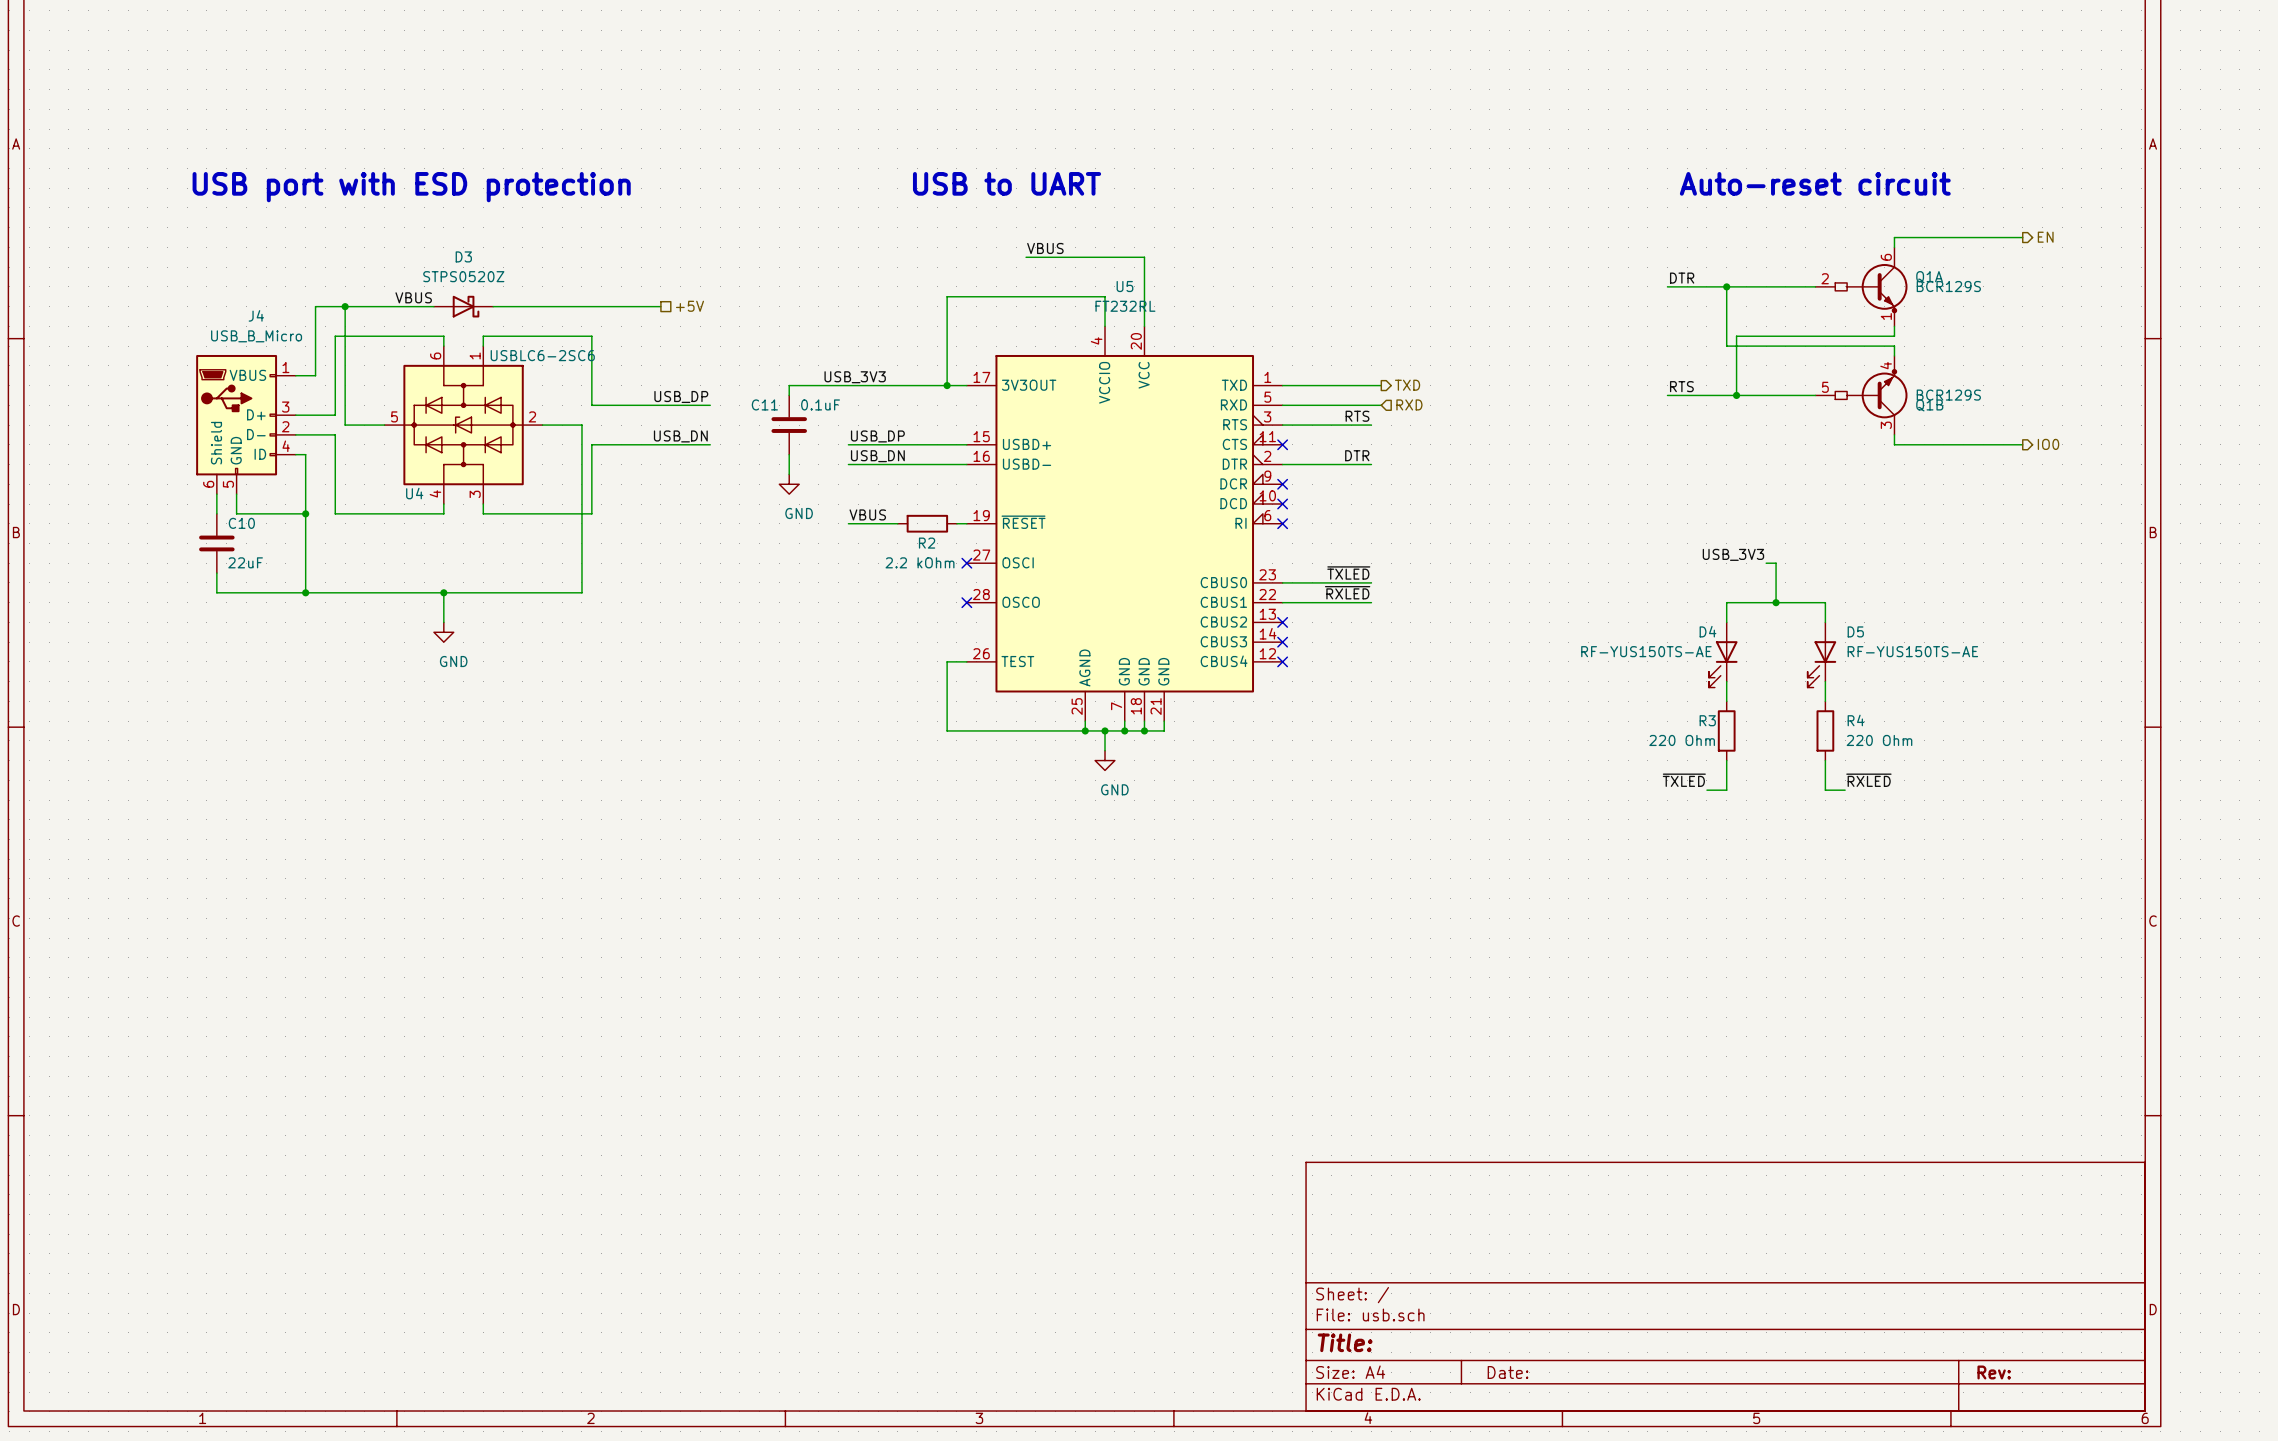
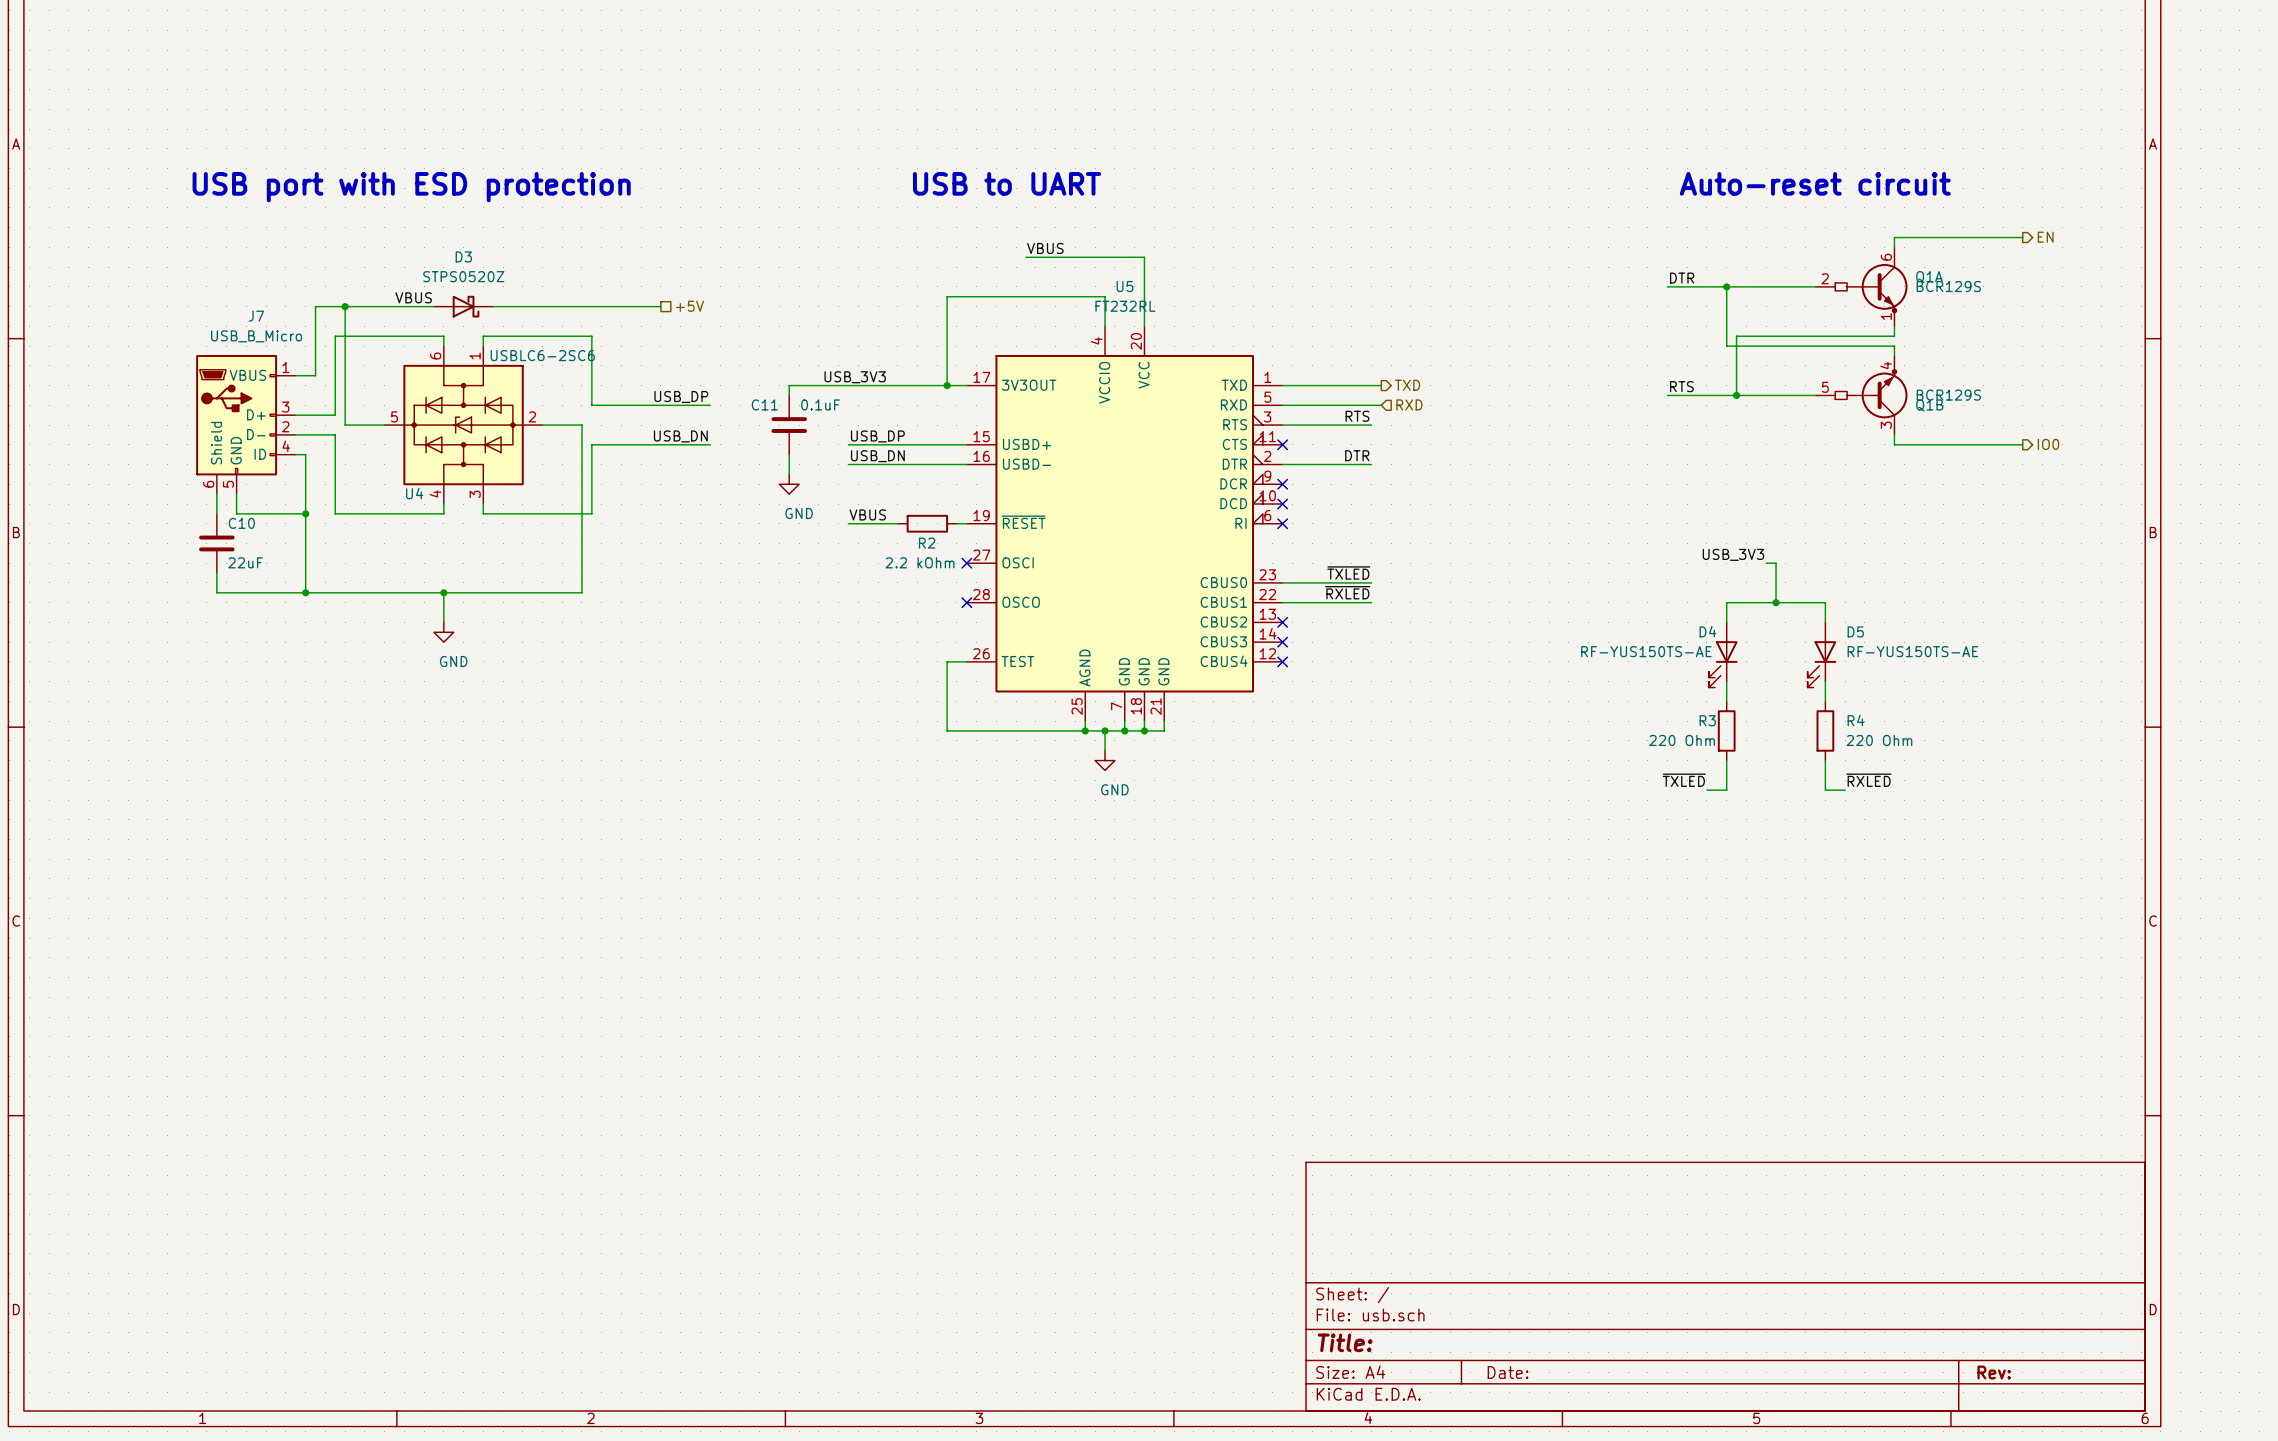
J4 name: J4 (256, 315) -> J7 (256, 316)

